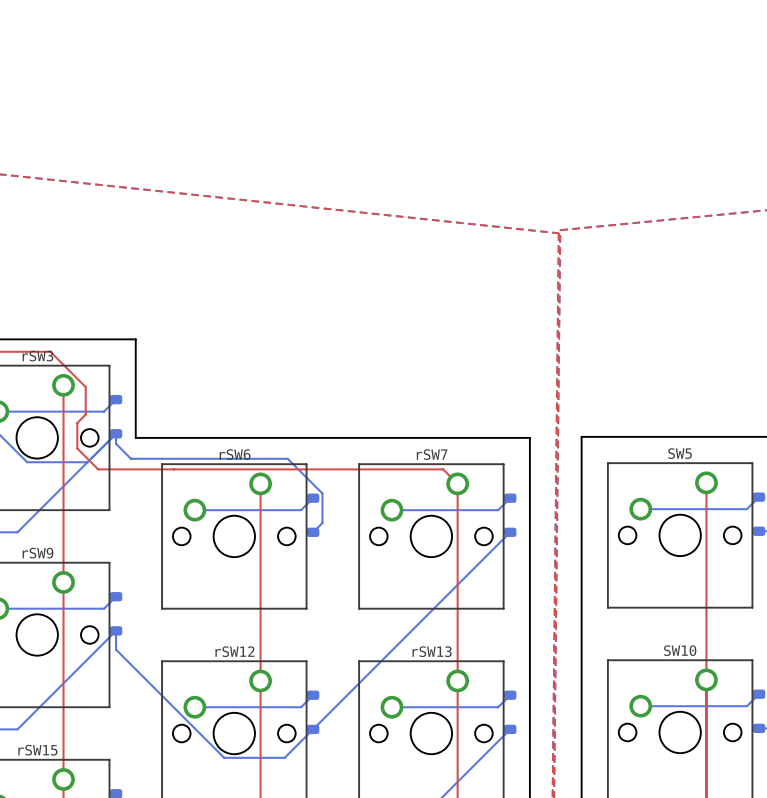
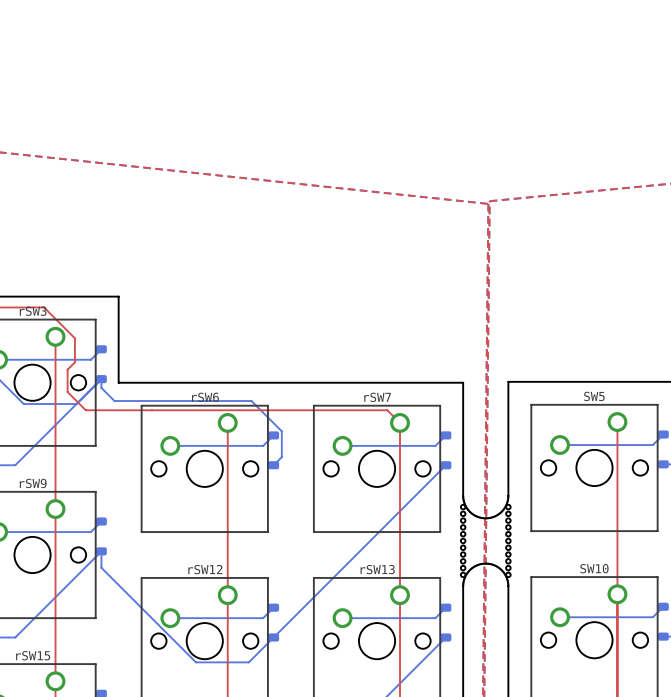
board edge: (529, 567) (529, 670) -> (463, 495) (464, 504) (469, 511) (477, 516) (485, 518) (494, 516) (501, 511) (506, 504) (508, 495)
board edge: (581, 567) (581, 670) -> (463, 586) (464, 577) (469, 570) (477, 565) (485, 563) (494, 565) (501, 570) (506, 577) (508, 586)
part: none -> (485, 540)

